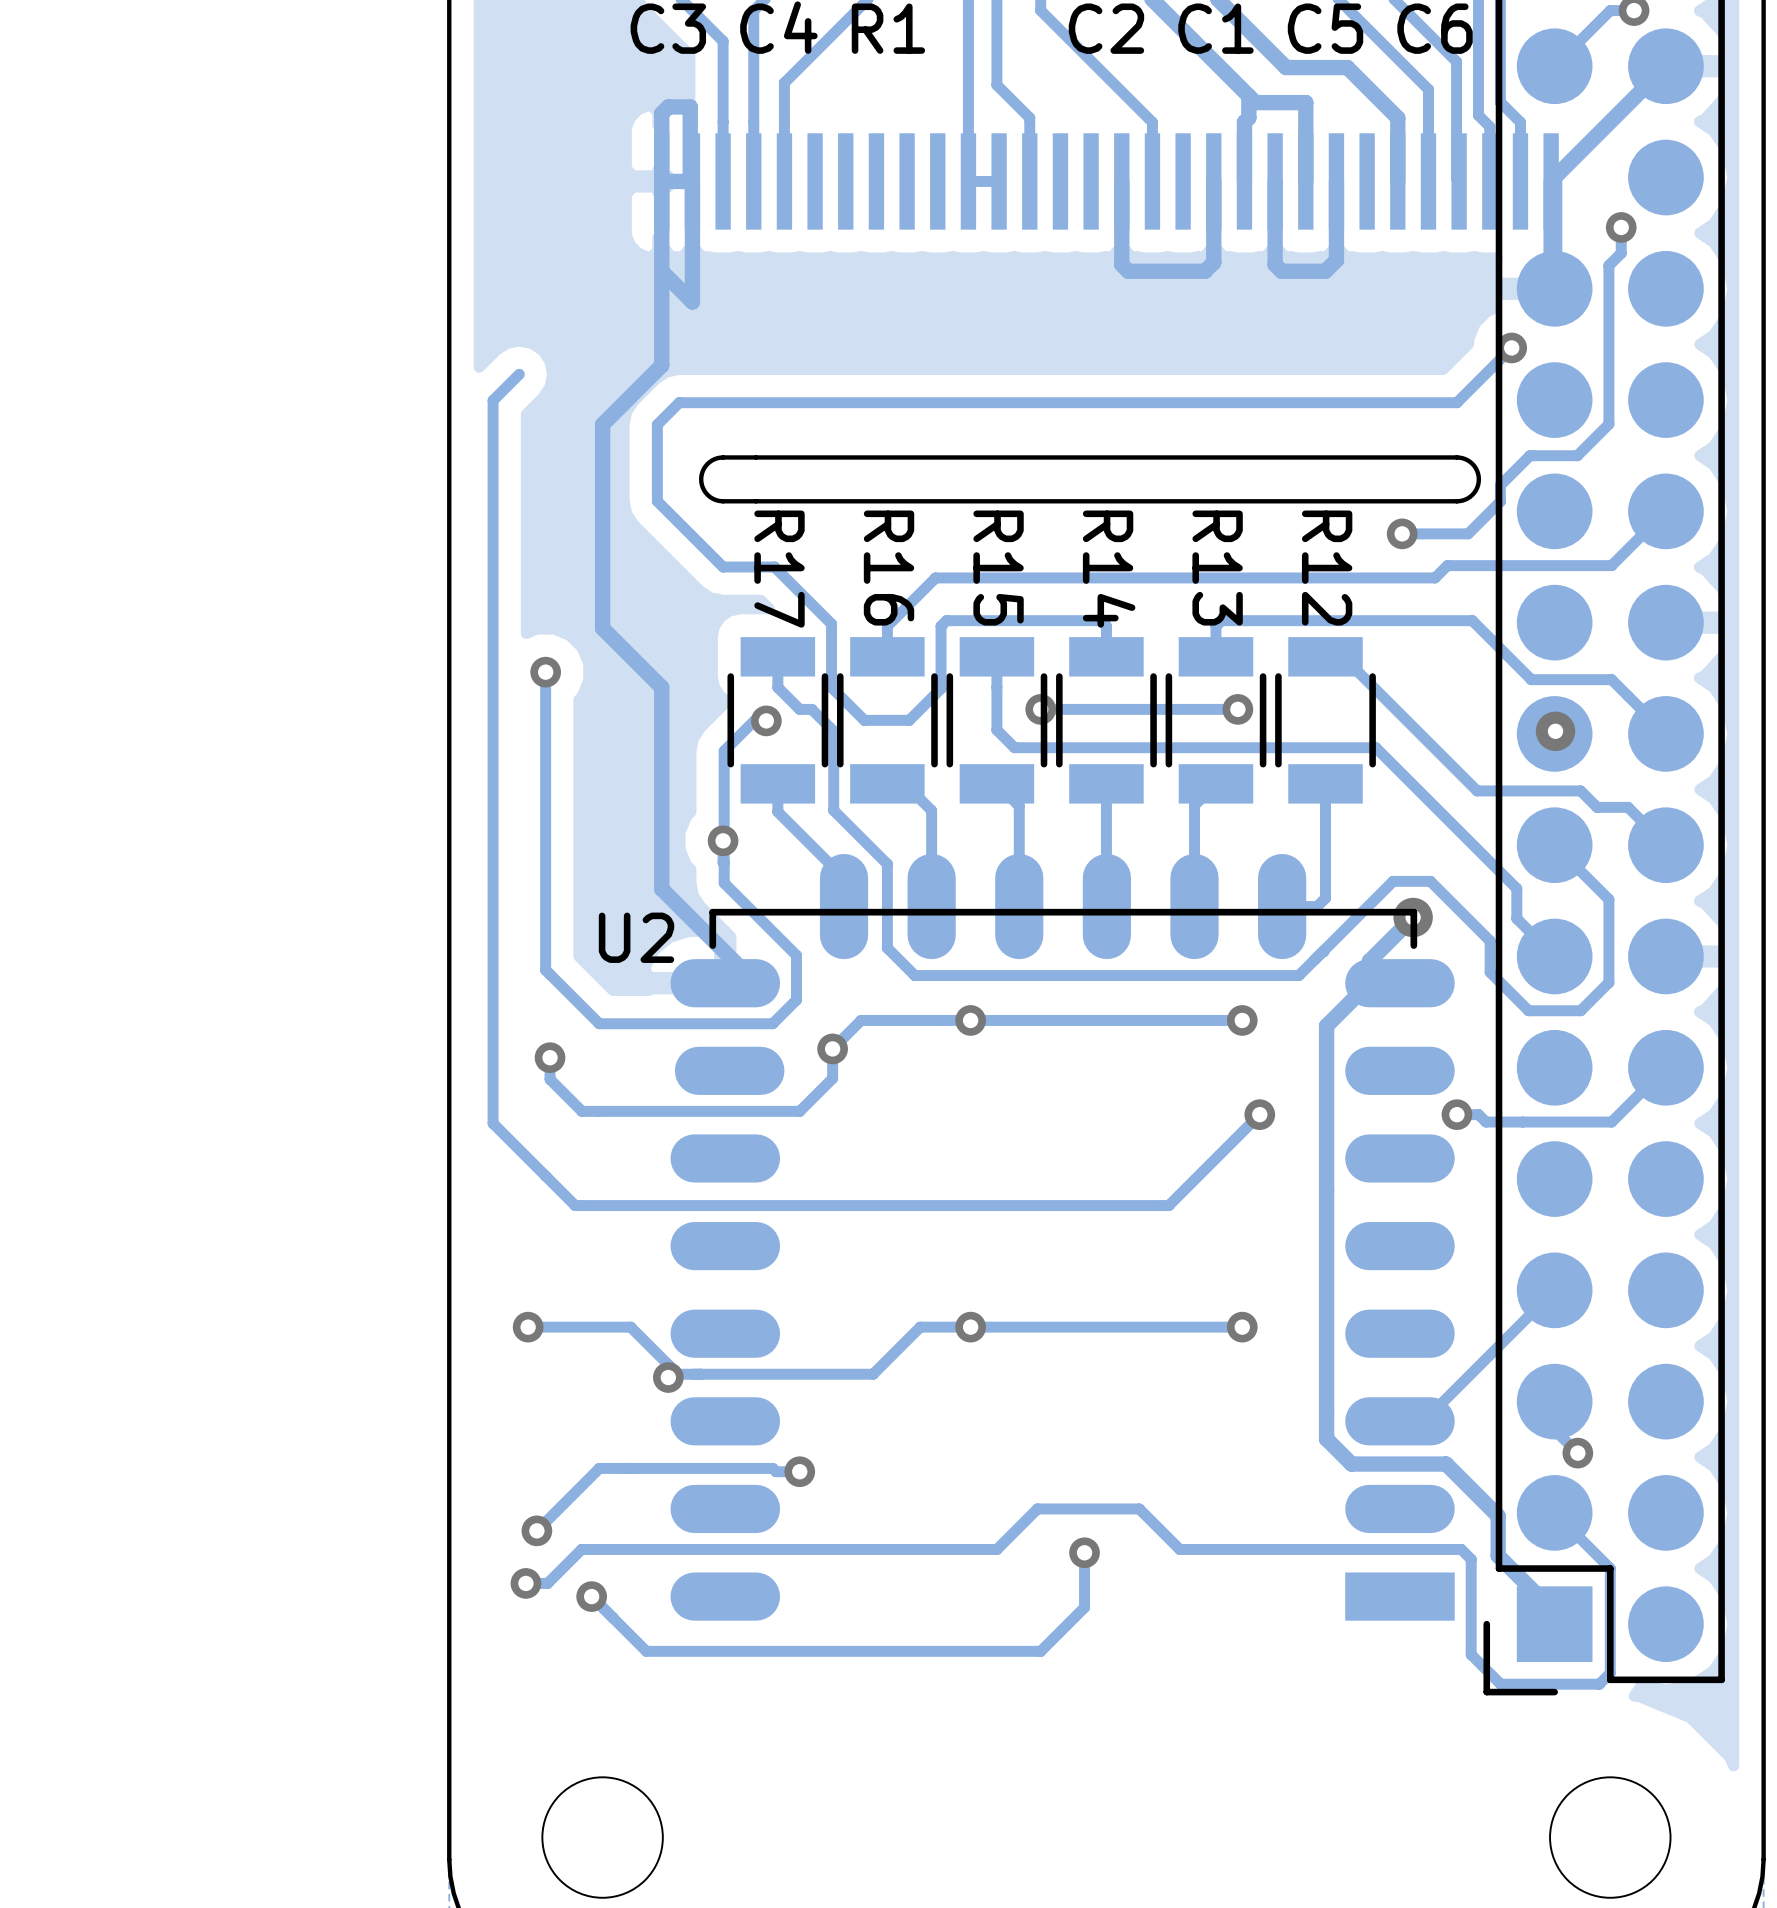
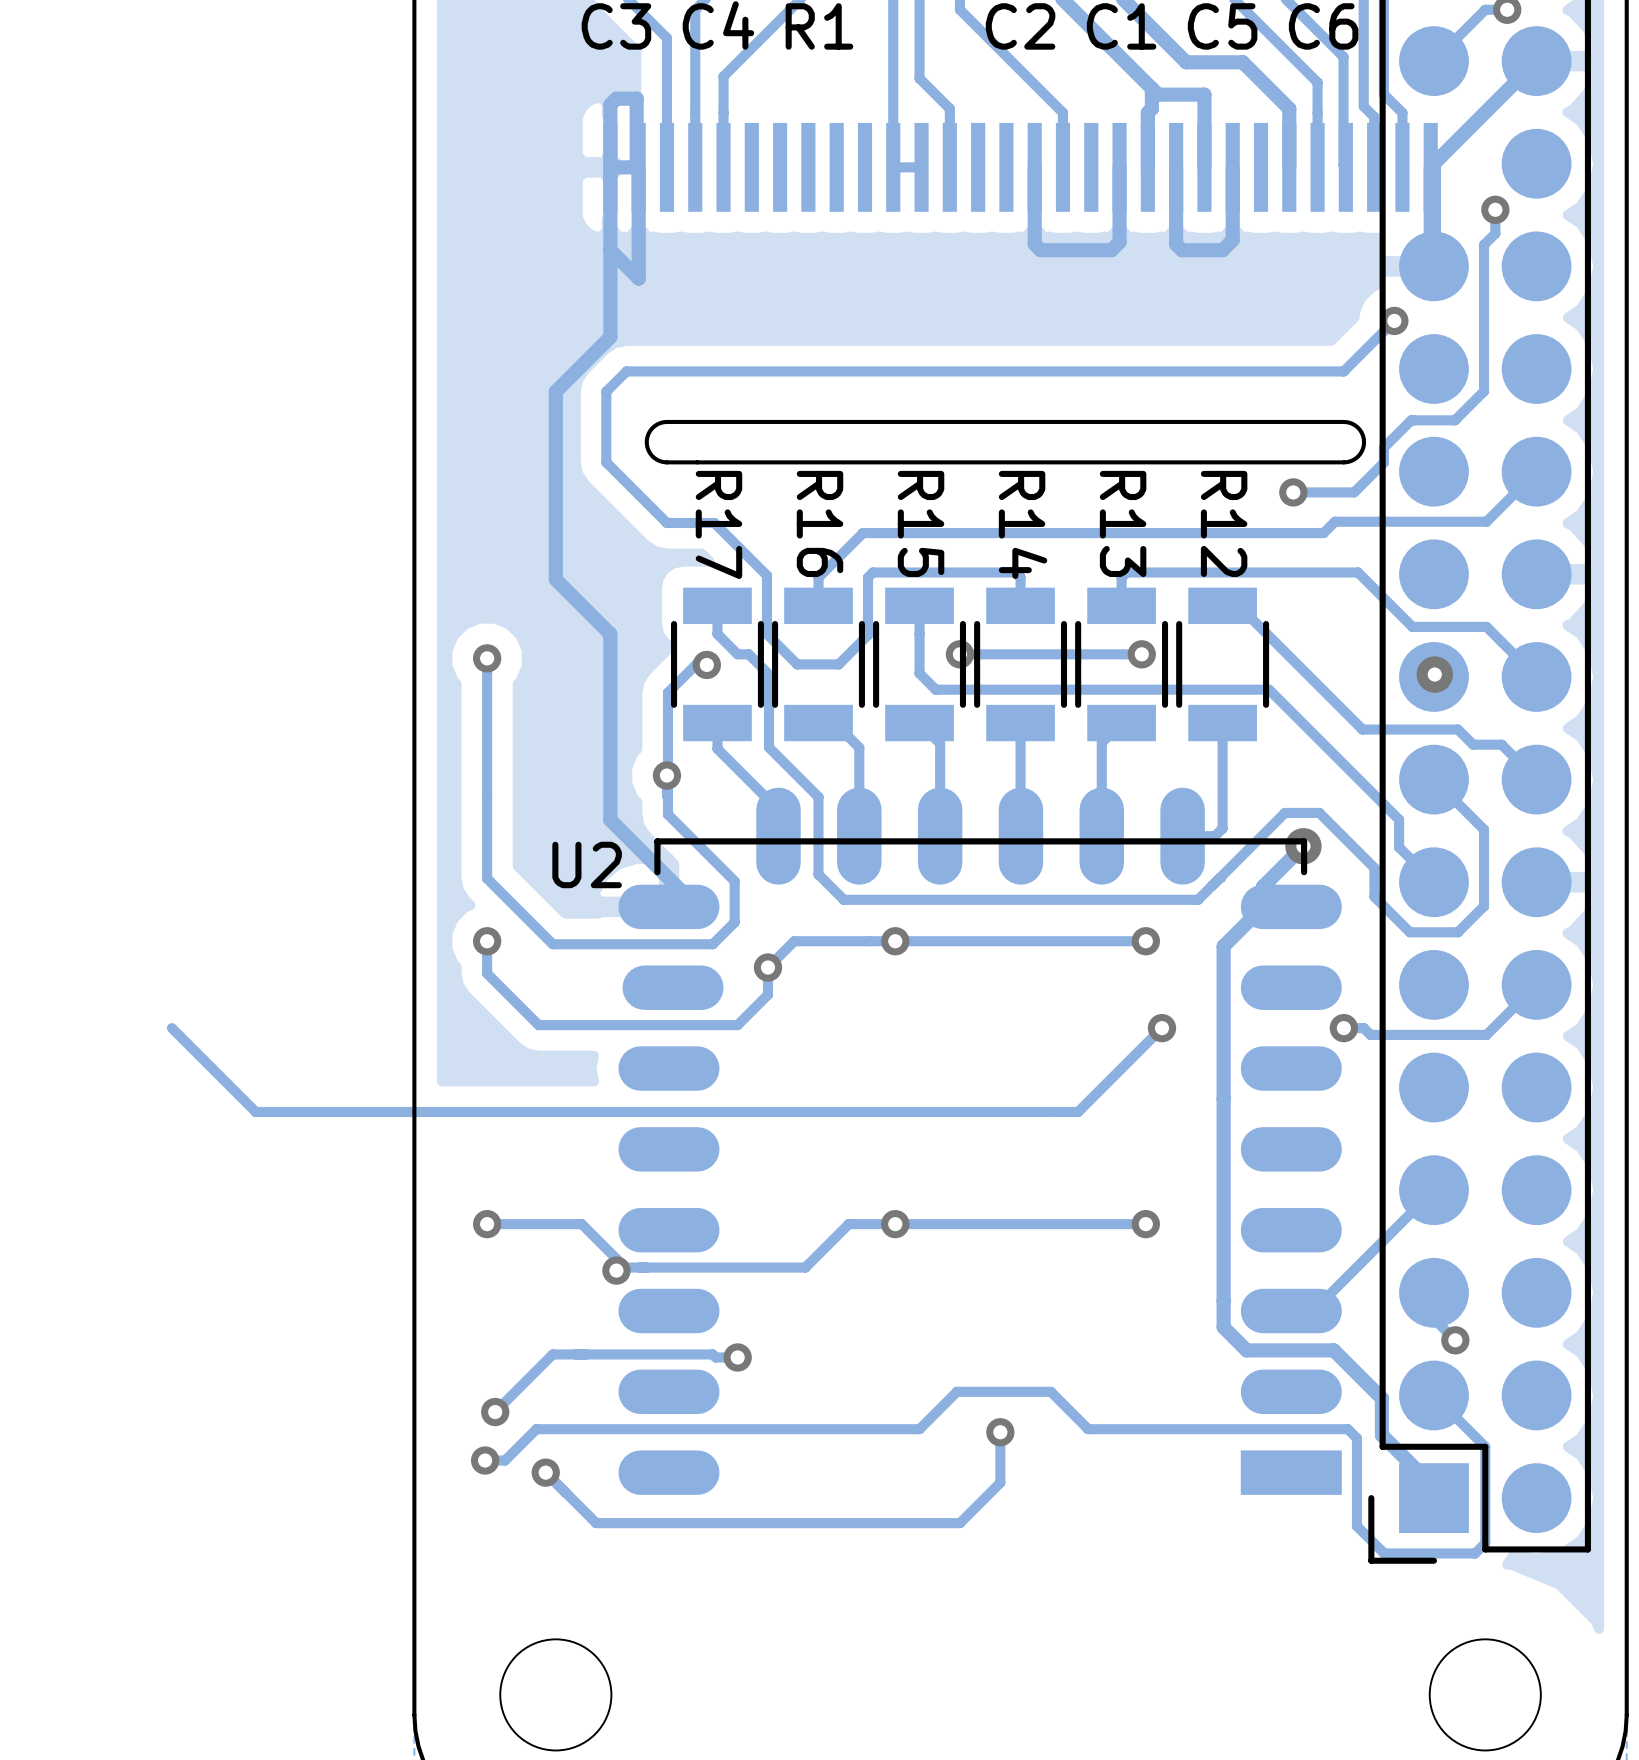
track: (519, 374) (493, 400) (493, 1123) (575, 1205) -> (171, 1028) (255, 1111) (530, 1111)
track: (545, 672) (545, 970) -> (487, 658) (487, 878) (503, 894)
via position: (545, 672) -> (487, 658)
track: (550, 1057) (550, 1079) (583, 1111) -> (487, 941) (487, 973) (538, 1025)
via position: (550, 1057) -> (487, 941)

